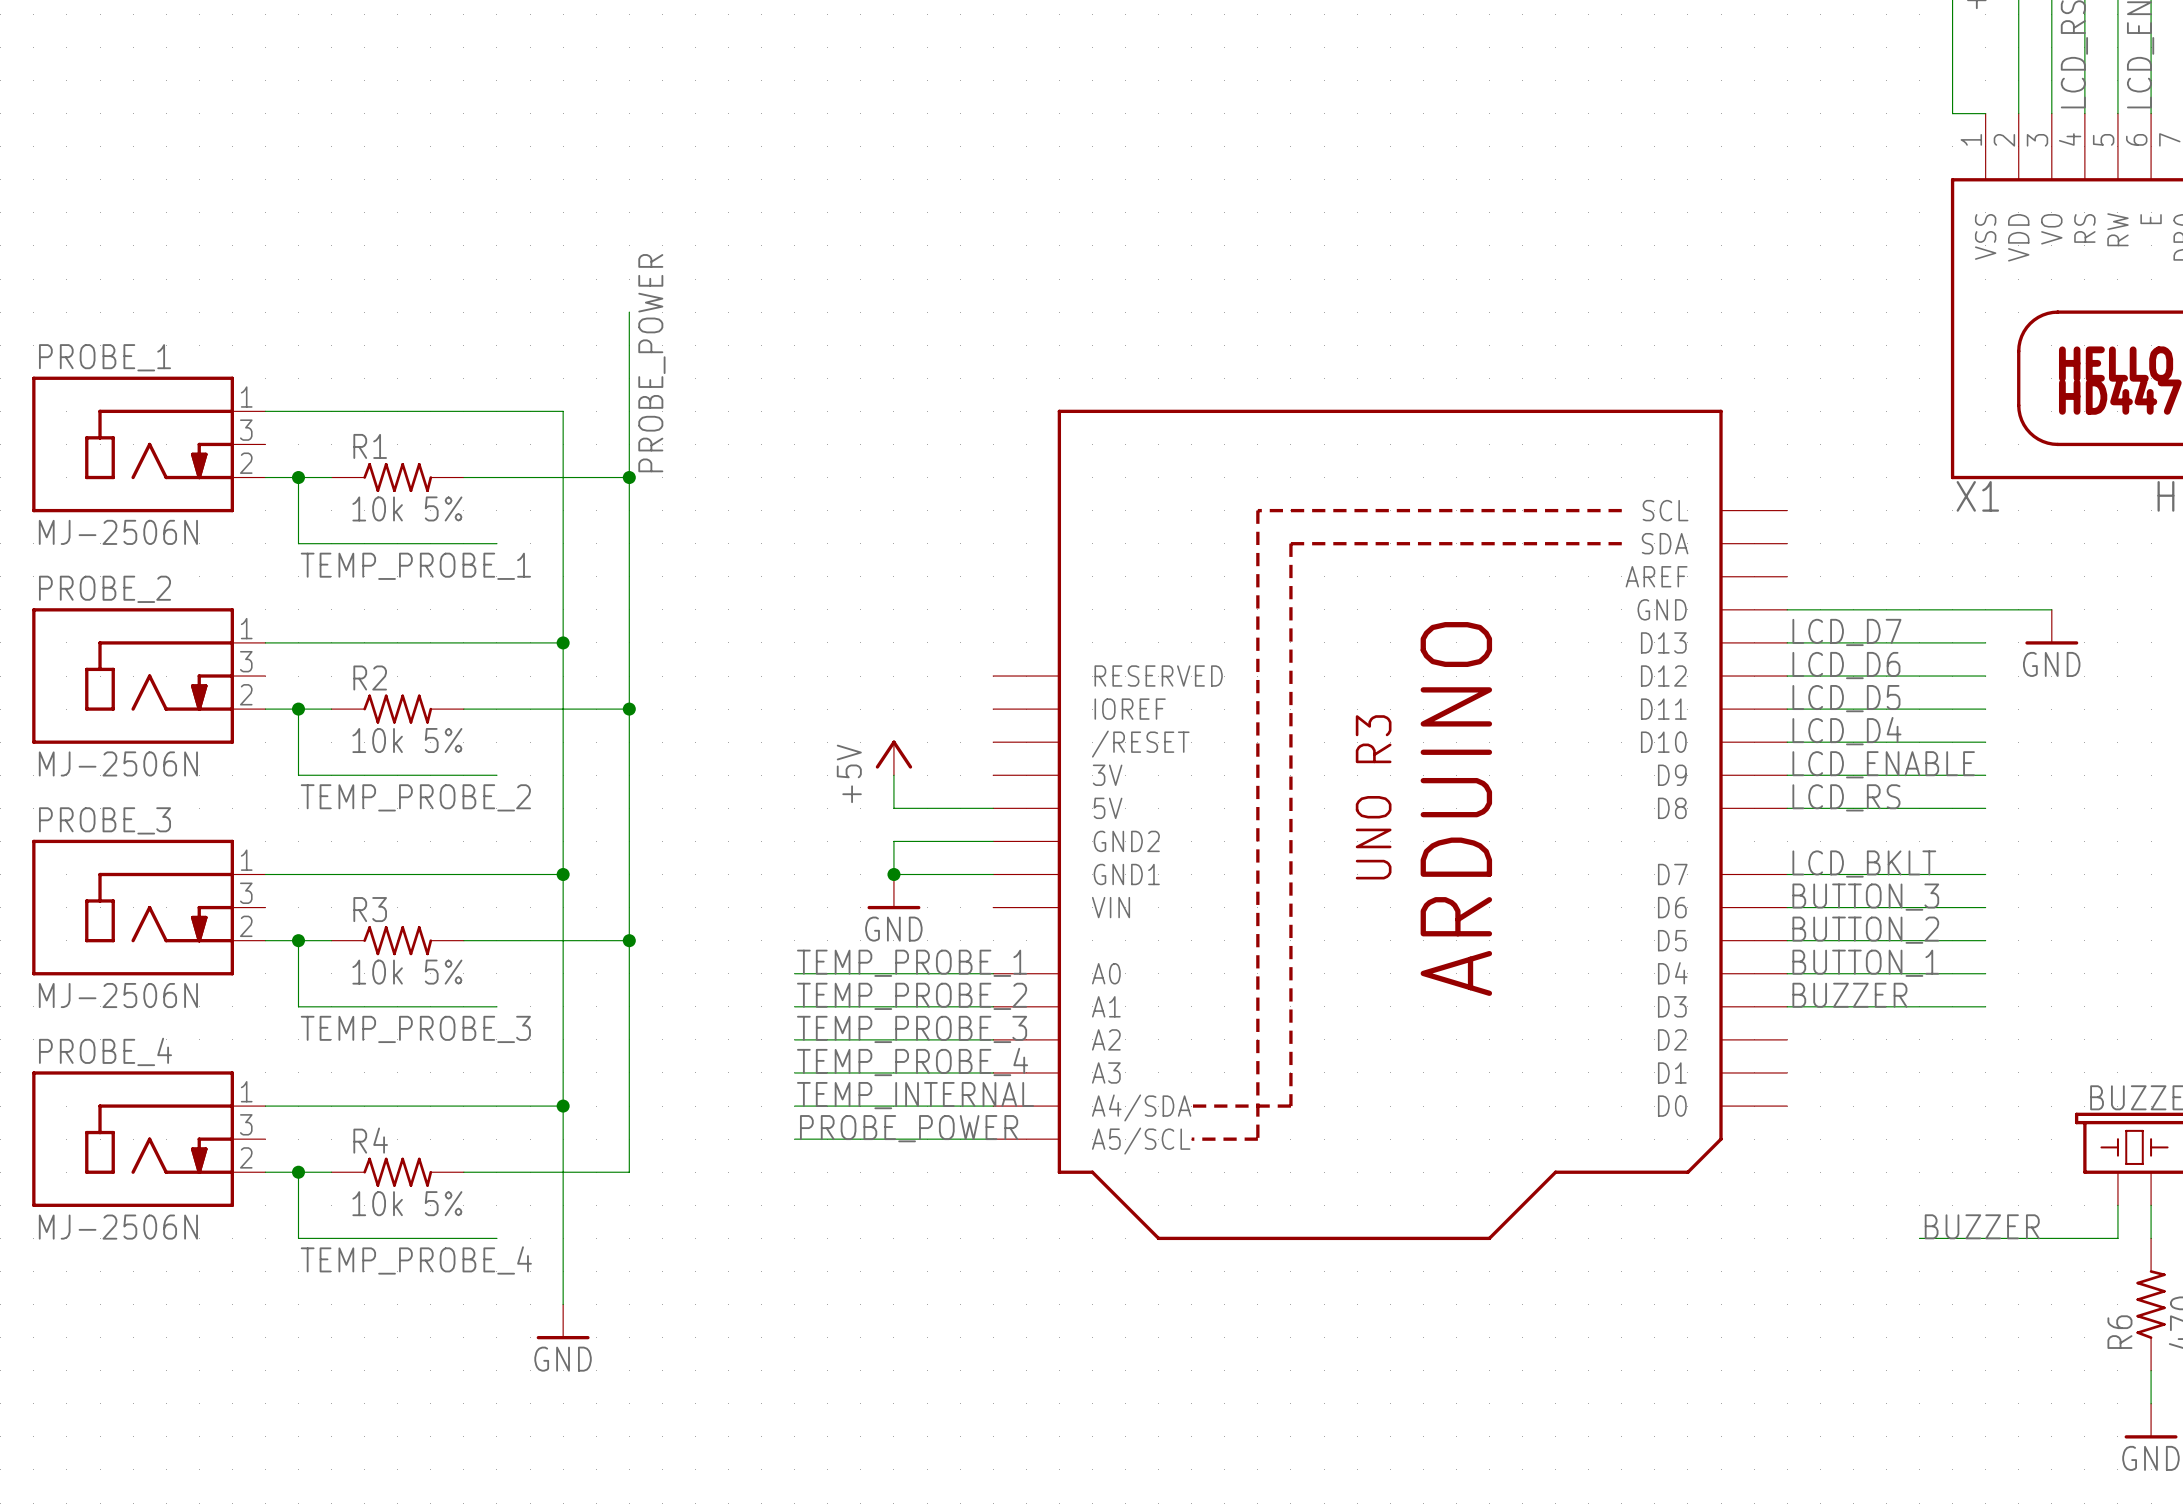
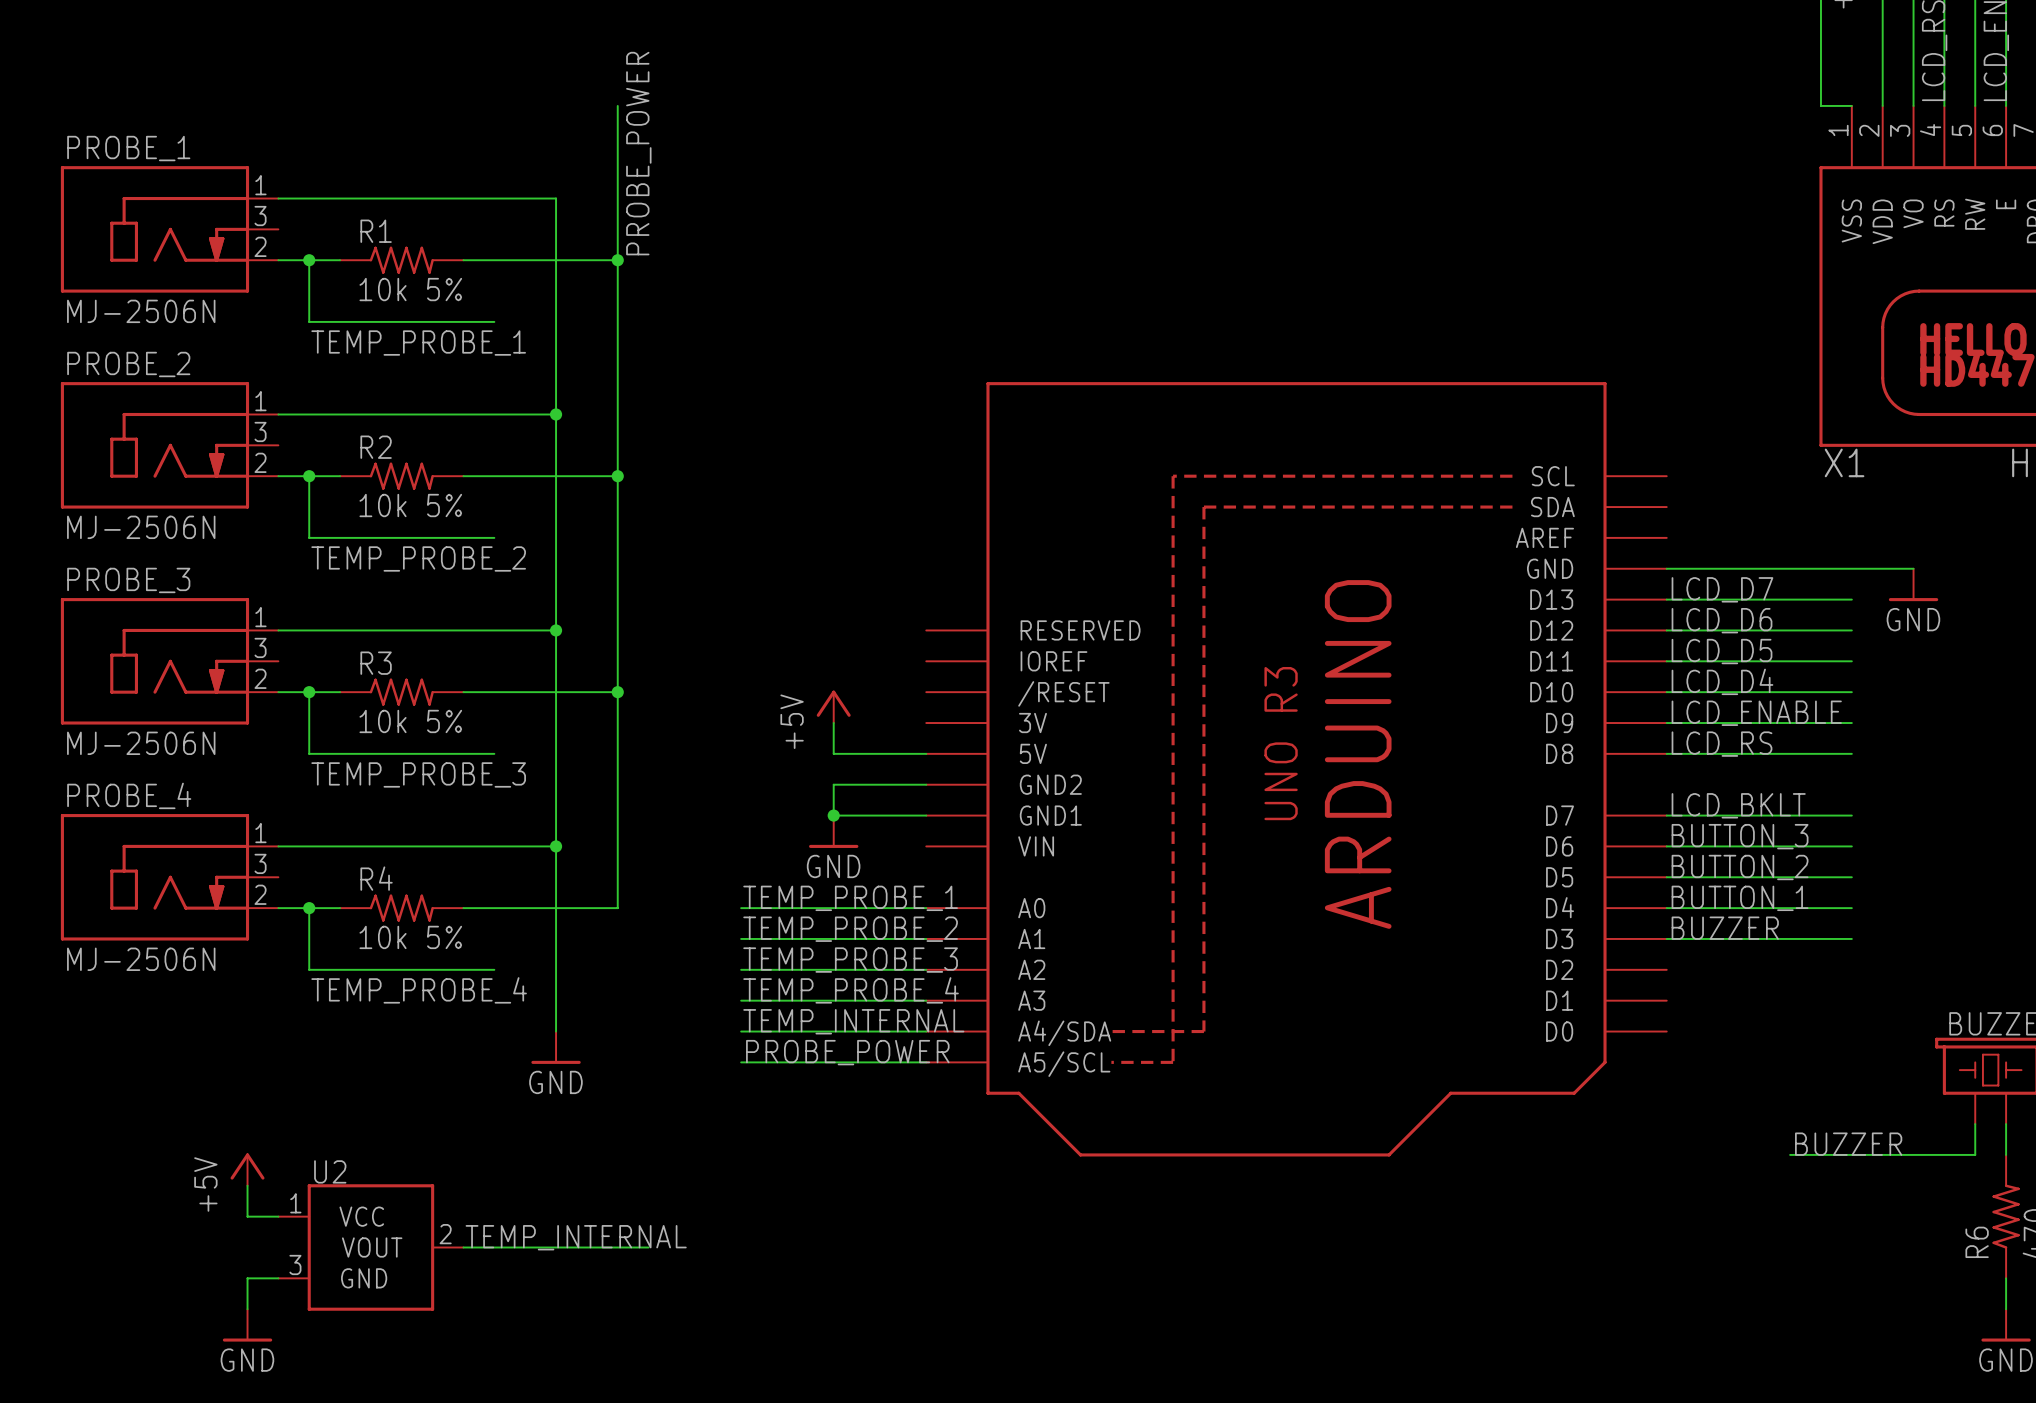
junction: none -> (309, 260)
junction: none -> (617, 260)
wire: (629, 312) (629, 1172) (463, 1172) -> (617, 105) (617, 908) (463, 908)
label position: PROBE_POWER (651, 363) -> PROBE_POWER (638, 153)
wire: (265, 411) (563, 411) (563, 1304) -> (278, 198) (556, 198) (556, 1031)
PROBE_1 position: (148, 444) -> (169, 229)
junction: none -> (556, 414)
wire: (265, 477) (331, 477) -> (278, 260) (340, 260)
wire: (298, 477) (298, 543) (496, 543) -> (309, 260) (309, 321) (494, 321)
junction position: (298, 477) -> (309, 476)
R1 position: (397, 477) -> (401, 260)
wire: (463, 477) (629, 477) -> (463, 260) (617, 260)
junction: (629, 477) -> none
junction: none -> (617, 476)
label position: TEMP_PROBE_1 (415, 566) -> TEMP_PROBE_1 (418, 343)
wire: (265, 642) (563, 642) -> (278, 414) (556, 414)
junction: (563, 642) -> none
PROBE_2 position: (148, 676) -> (169, 445)
junction: none -> (556, 630)
wire: (265, 709) (331, 709) -> (278, 476) (340, 476)
wire: (298, 709) (298, 775) (496, 775) -> (309, 476) (309, 537) (494, 537)
junction position: (298, 709) -> (309, 692)
R2 position: (397, 709) -> (401, 476)
wire: (463, 709) (629, 709) -> (463, 476) (617, 476)
junction: (629, 709) -> none
junction: none -> (617, 692)
label position: TEMP_PROBE_2 (415, 797) -> TEMP_PROBE_2 (418, 558)
wire: (265, 874) (563, 874) -> (278, 630) (556, 630)
junction: (563, 874) -> none
PROBE_3 position: (148, 907) -> (169, 661)
junction: none -> (556, 846)
wire: (265, 940) (331, 940) -> (278, 692) (340, 692)
wire: (298, 940) (298, 1006) (496, 1006) -> (309, 692) (309, 753) (494, 753)
junction position: (298, 940) -> (309, 908)
R3 position: (397, 940) -> (401, 692)
wire: (463, 940) (629, 940) -> (463, 692) (617, 692)
junction: (629, 940) -> none
label position: TEMP_PROBE_3 (415, 1029) -> TEMP_PROBE_3 (418, 774)
wire: (265, 1106) (563, 1106) -> (278, 846) (556, 846)
junction: (563, 1106) -> none
power symbol: none -> GND (556, 1047)
PROBE_4 position: (148, 1139) -> (169, 877)
wire: (265, 1172) (331, 1172) -> (278, 908) (340, 908)
wire: (298, 1172) (298, 1238) (496, 1238) -> (309, 908) (309, 969) (494, 969)
junction: (298, 1172) -> none
R4 position: (397, 1172) -> (401, 908)
power symbol: none -> +5V (247, 1169)
label position: TEMP_PROBE_4 (416, 1260) -> TEMP_PROBE_4 (419, 990)
wire: none -> (247, 1185) (247, 1216) (278, 1216)
power symbol: GND (563, 1321) -> none
label: none -> TEMP_INTERNAL (576, 1237)
U2: none -> (370, 1247)
wire: none -> (463, 1247) (648, 1247)
wire: none -> (278, 1278) (247, 1278) (247, 1309)
power symbol: none -> GND (247, 1325)

